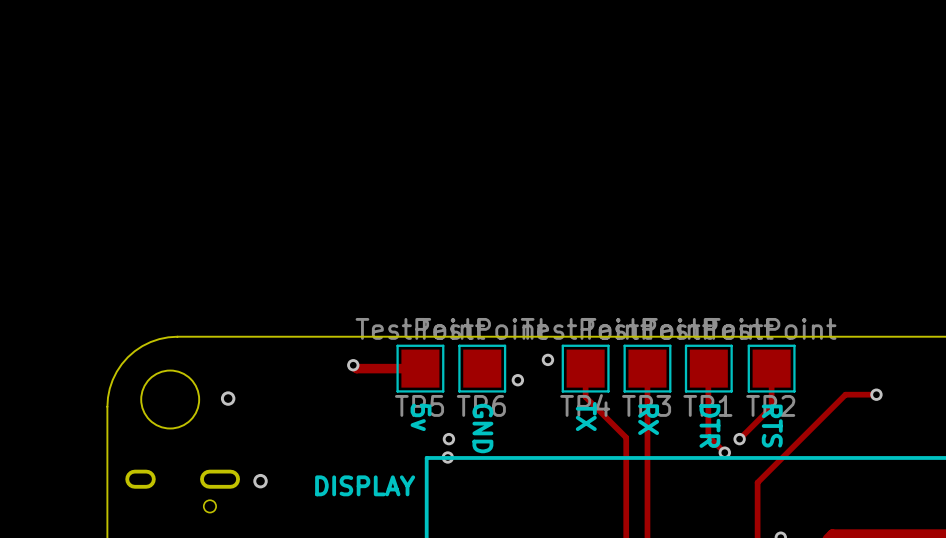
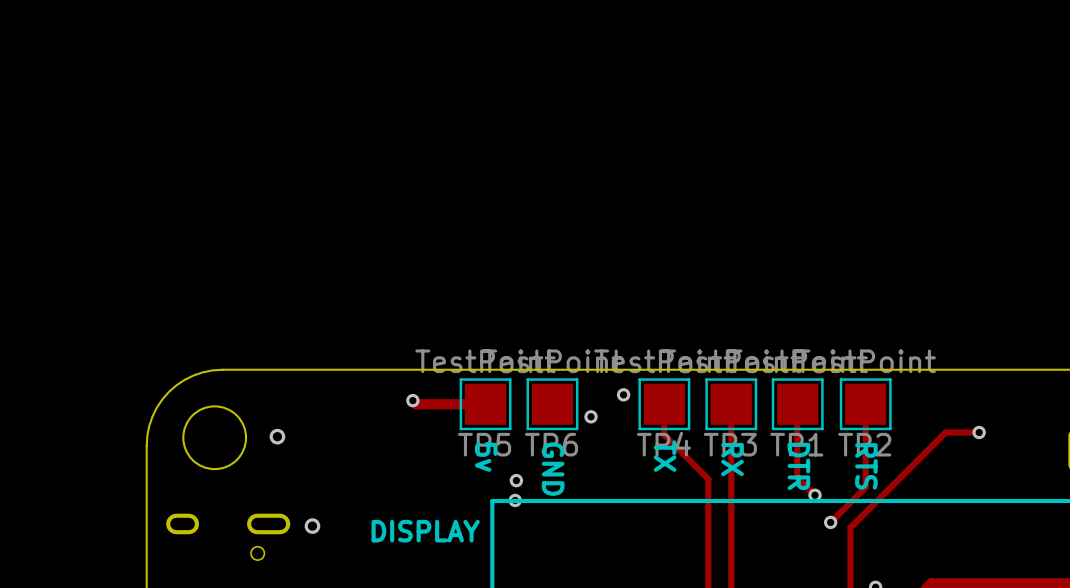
track: (771, 407) (739, 439) -> (865, 445) (865, 487) (830, 522)
via position: (739, 439) -> (830, 522)

